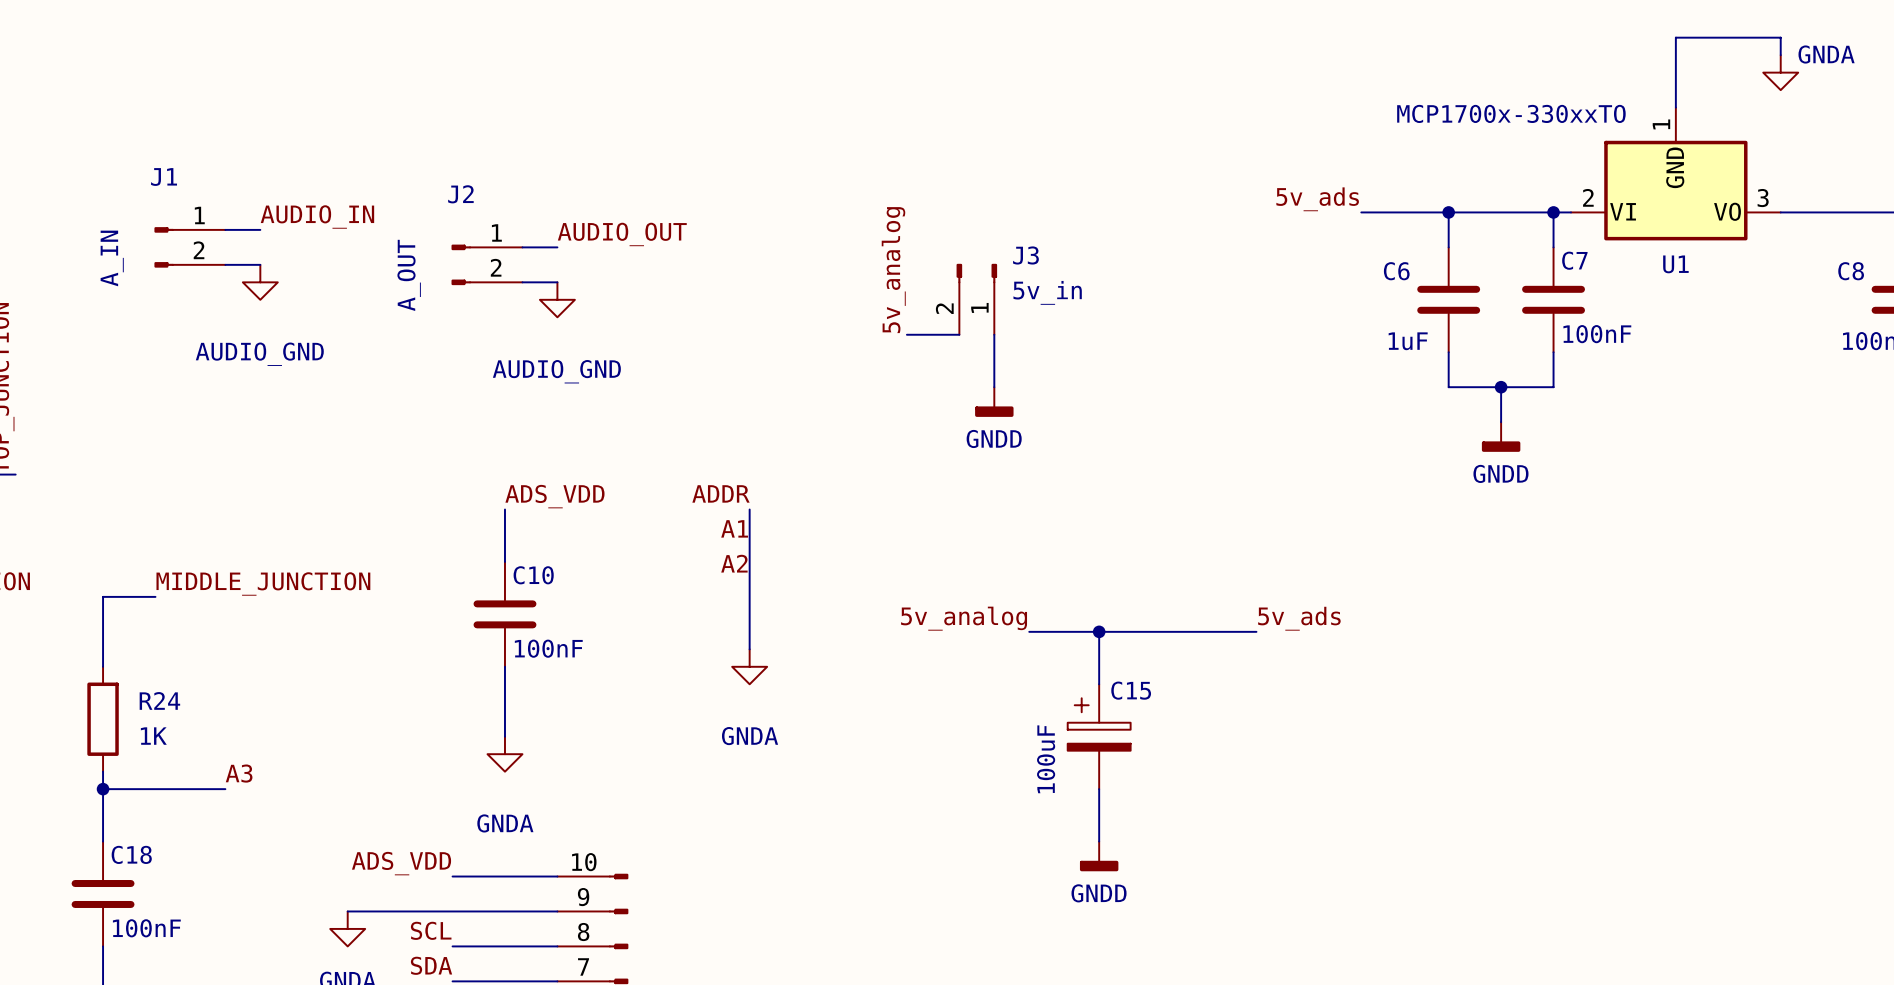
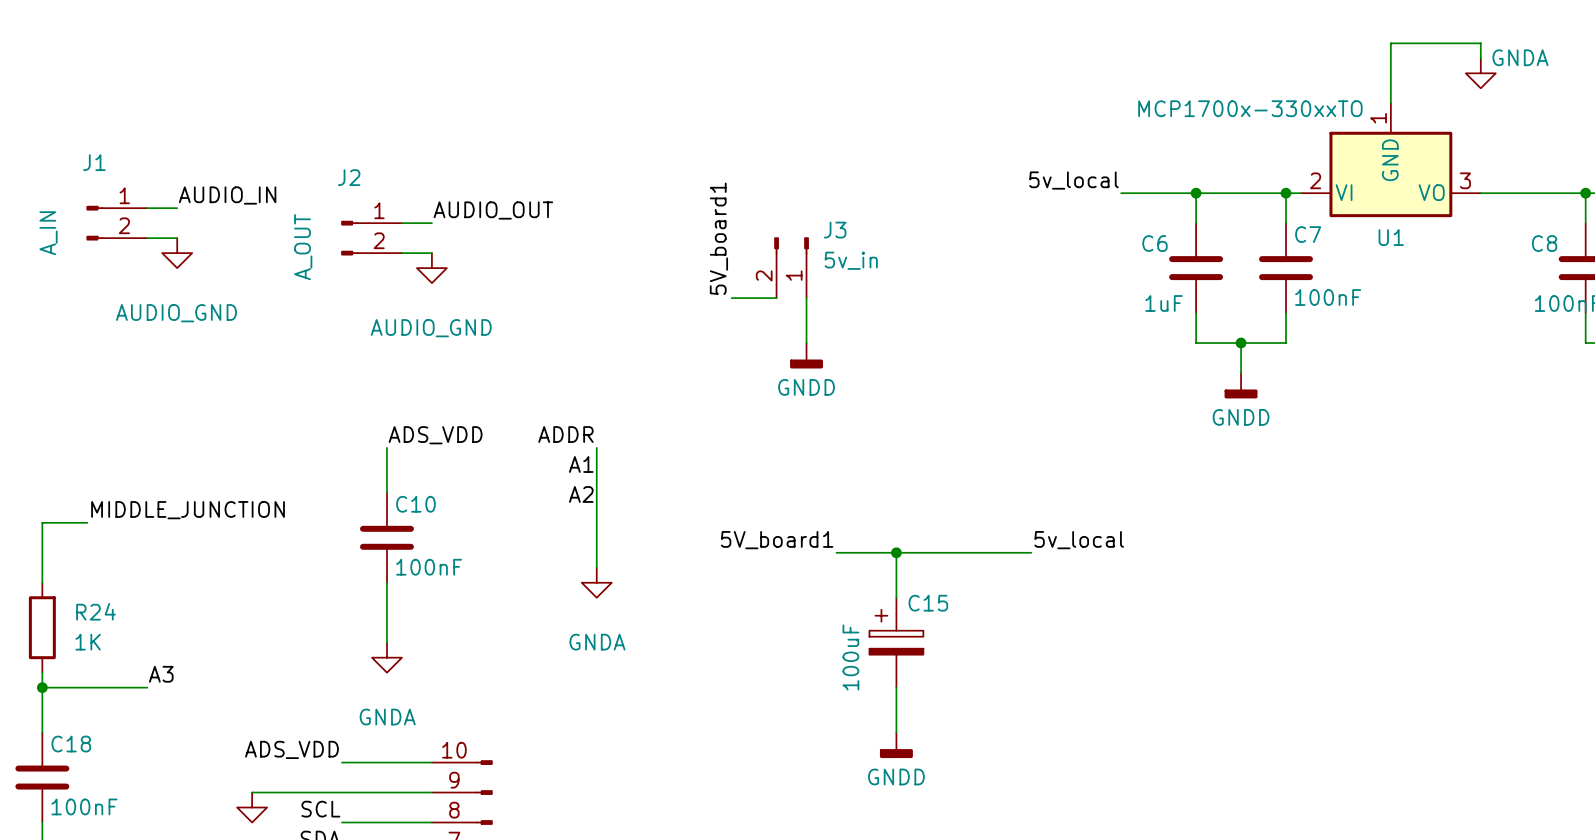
label: 5v_ads (1317, 199) -> 5v_local (1073, 180)
label: 5v_analog (893, 270) -> 5V_board1 (718, 238)
label: 5v_analog (964, 618) -> 5V_board1 (777, 540)
label: 5v_ads (1299, 618) -> 5v_local (1079, 540)

